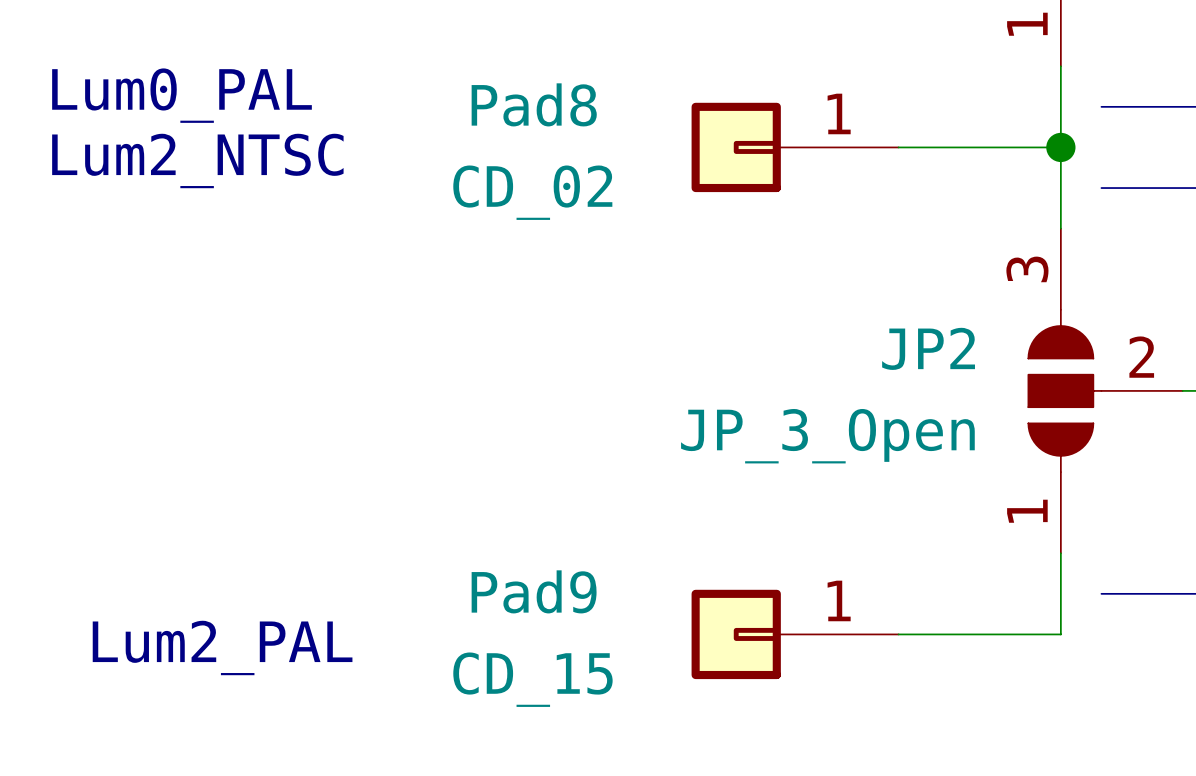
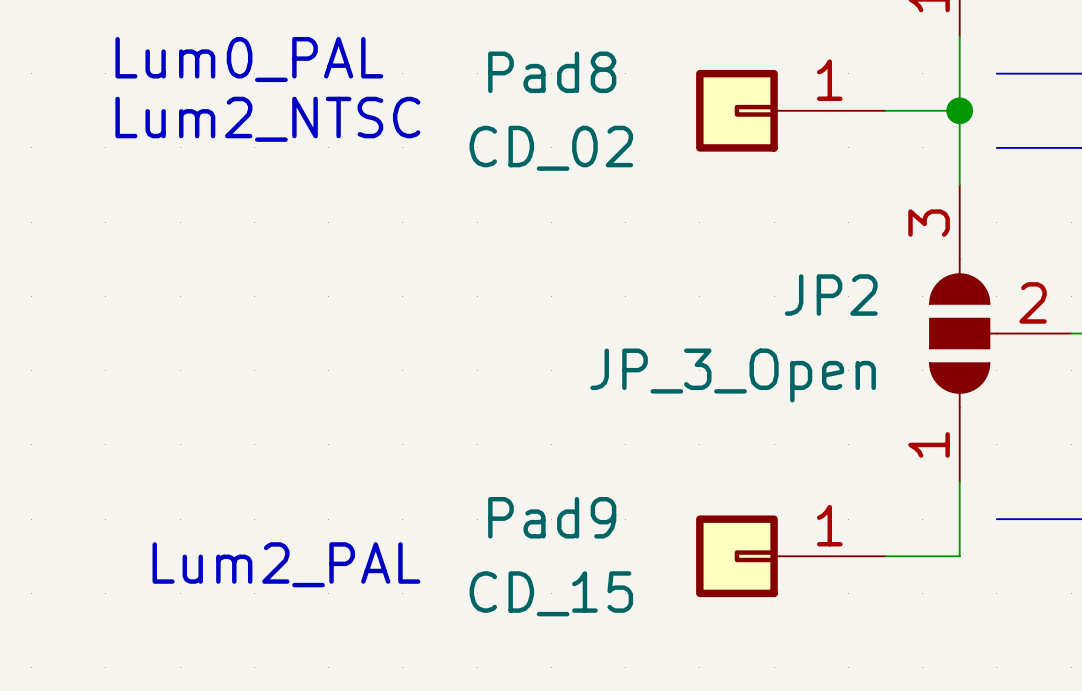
text position: Lum0_PAL (182, 95) -> Lum0_PAL (249, 59)
Pad8 position: (795, 147) -> (790, 110)
text position: Lum2_NTSC (197, 160) -> Lum2_NTSC (267, 119)
Pad9 position: (795, 634) -> (790, 556)
text position: Lum2_PAL (222, 647) -> Lum2_PAL (286, 564)

